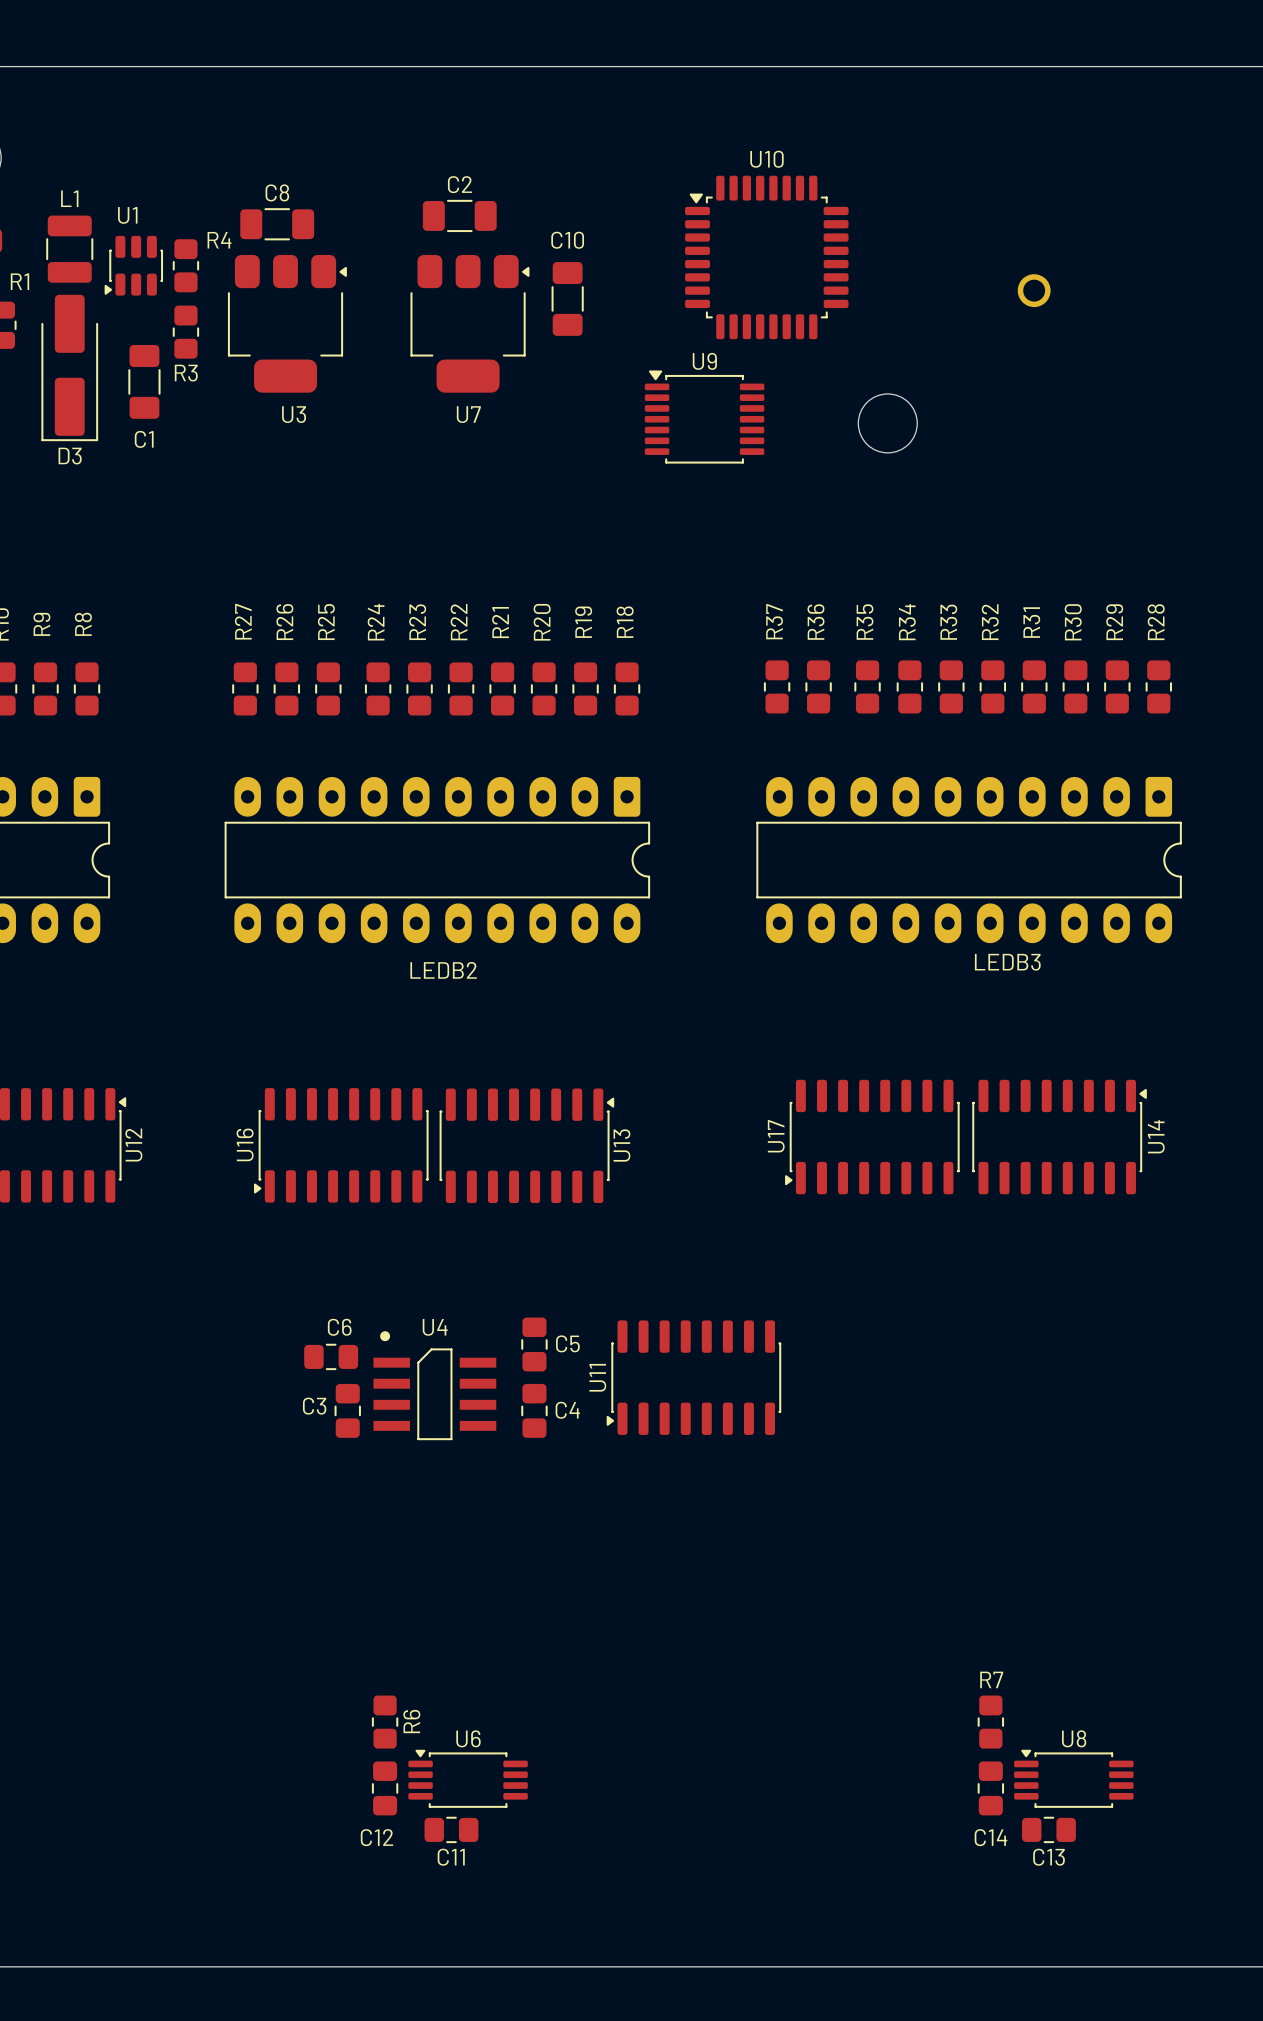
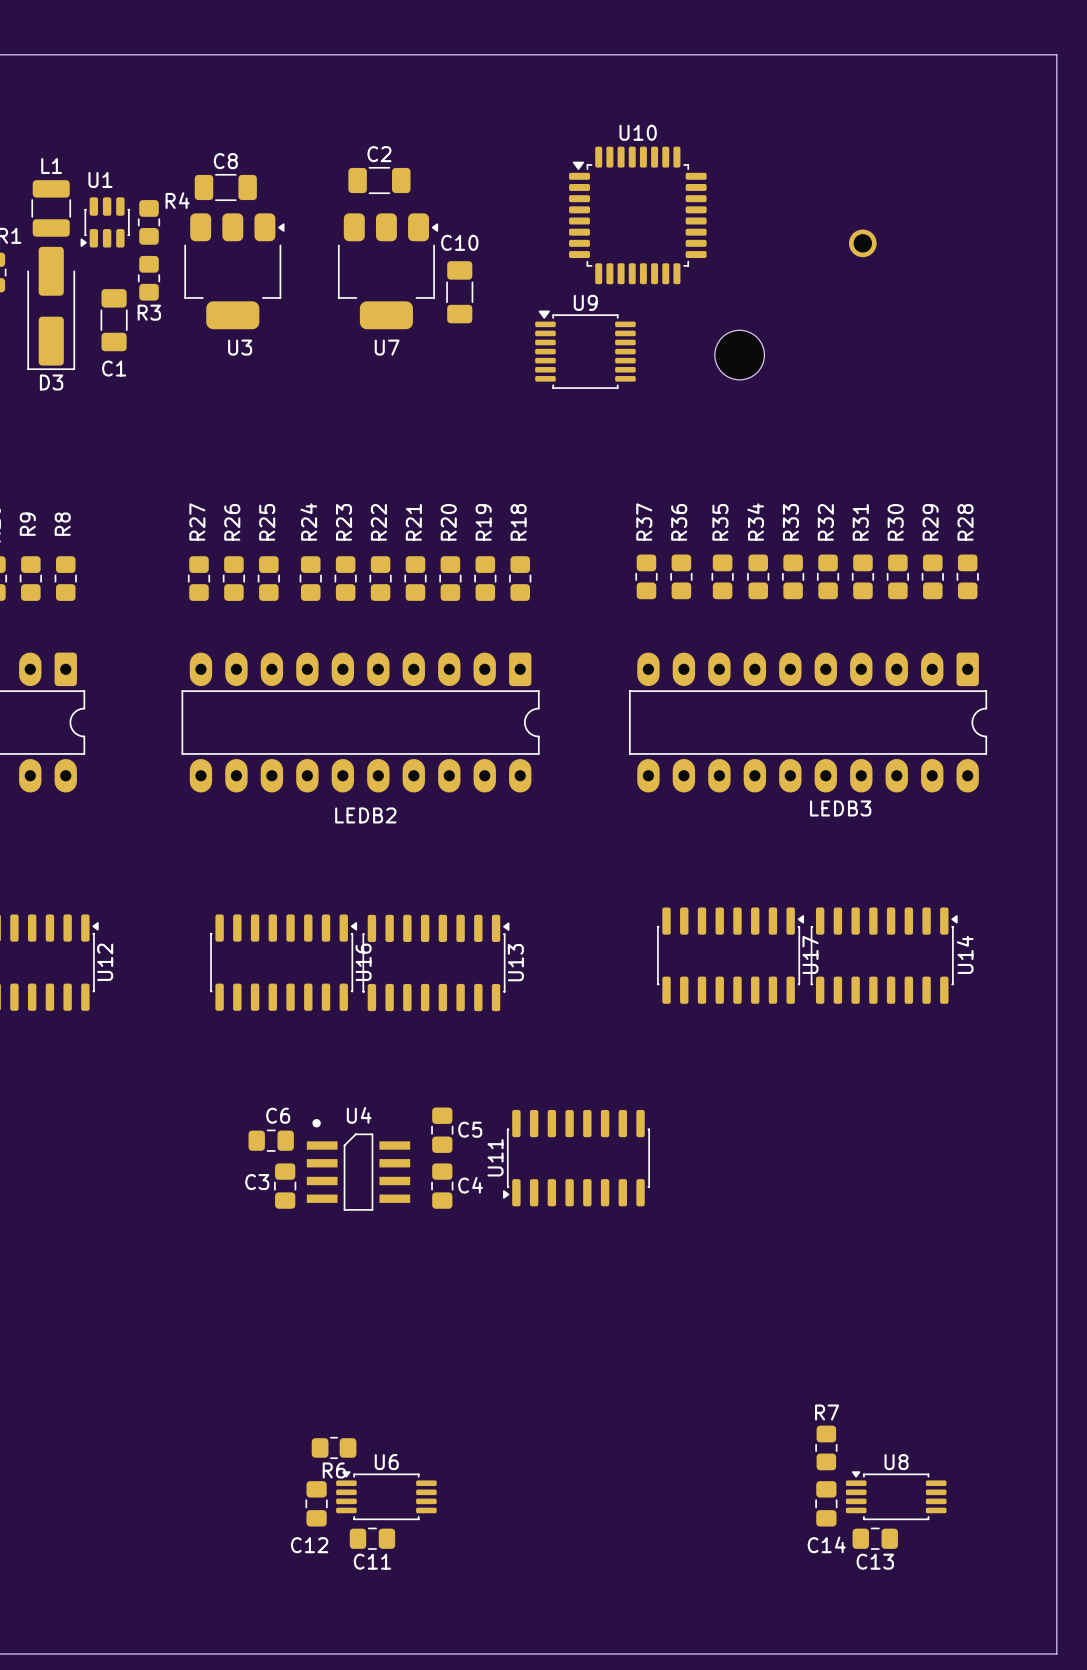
C10 position: (567, 298) -> (459, 292)
U17 rotation: 0° (872, 1137) -> 180° (730, 955)
U16 rotation: 0° (341, 1145) -> 180° (283, 962)
R6 rotation: 0° (385, 1722) -> 90° clockwise (334, 1447)

